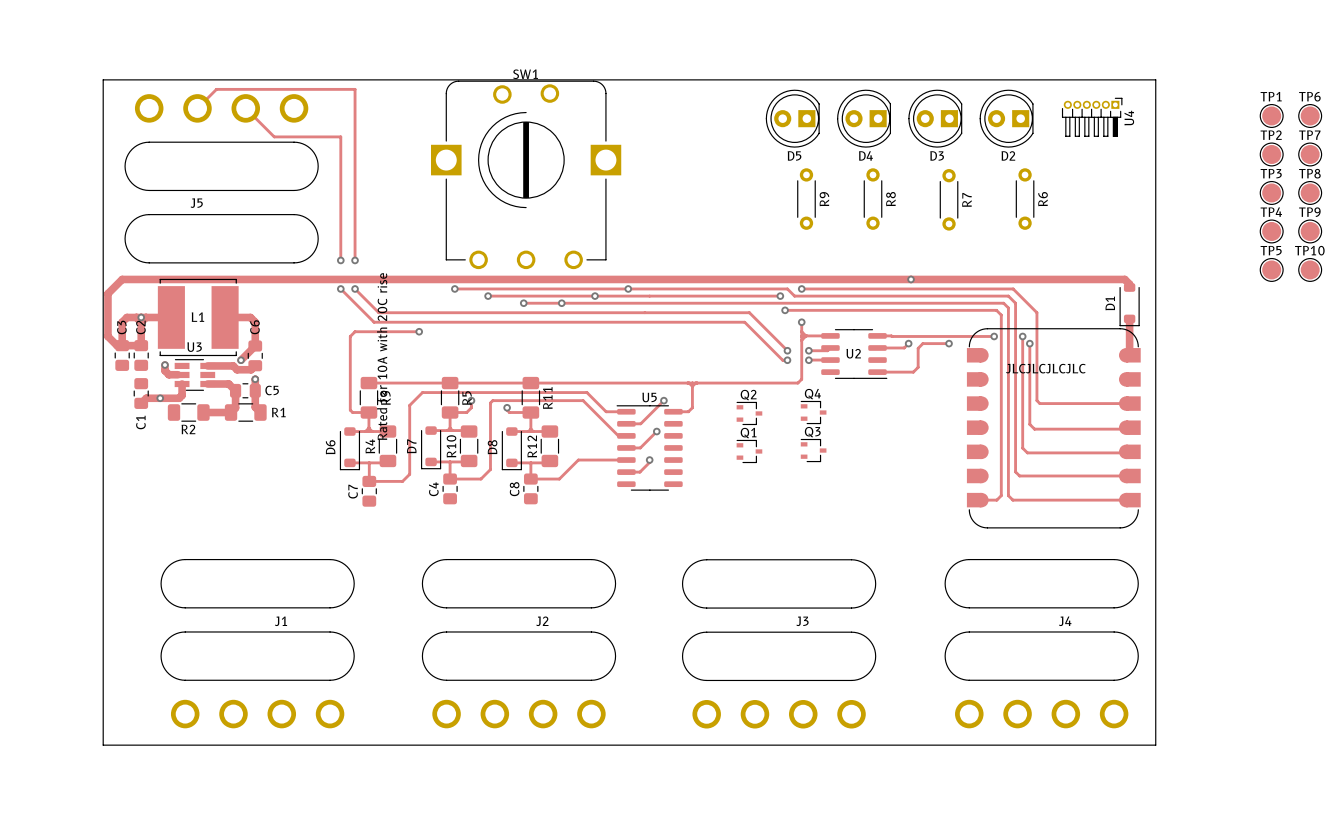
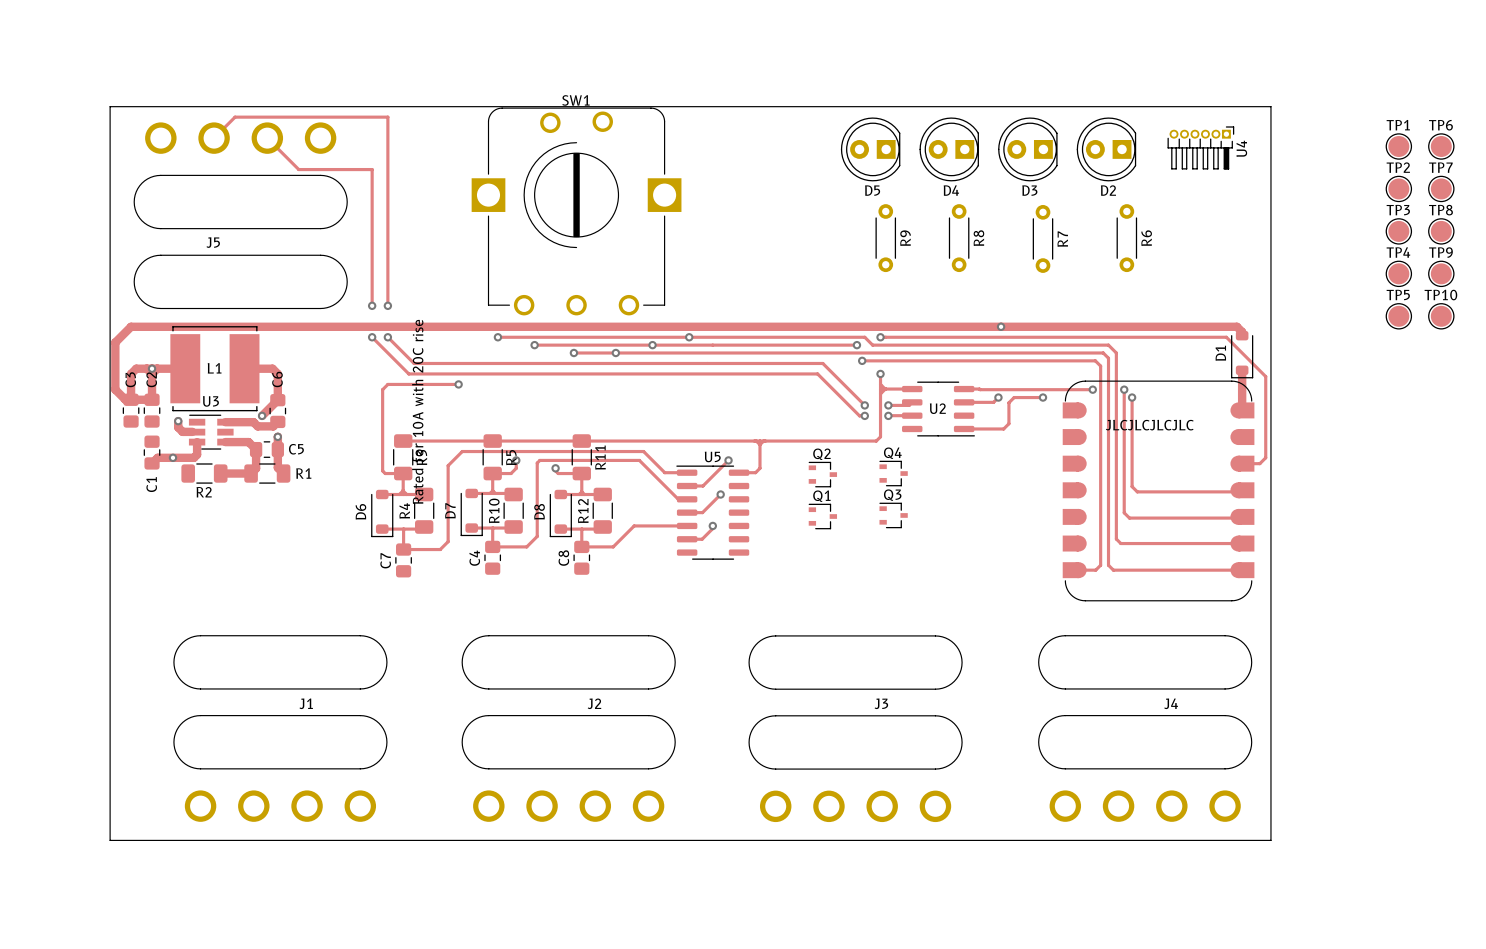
track: (1013, 288) (1036, 312) (1036, 400) (1039, 403) (1133, 403) -> (1113, 337) (1226, 337) (1265, 376) (1265, 457) (1259, 463) (1246, 463)

